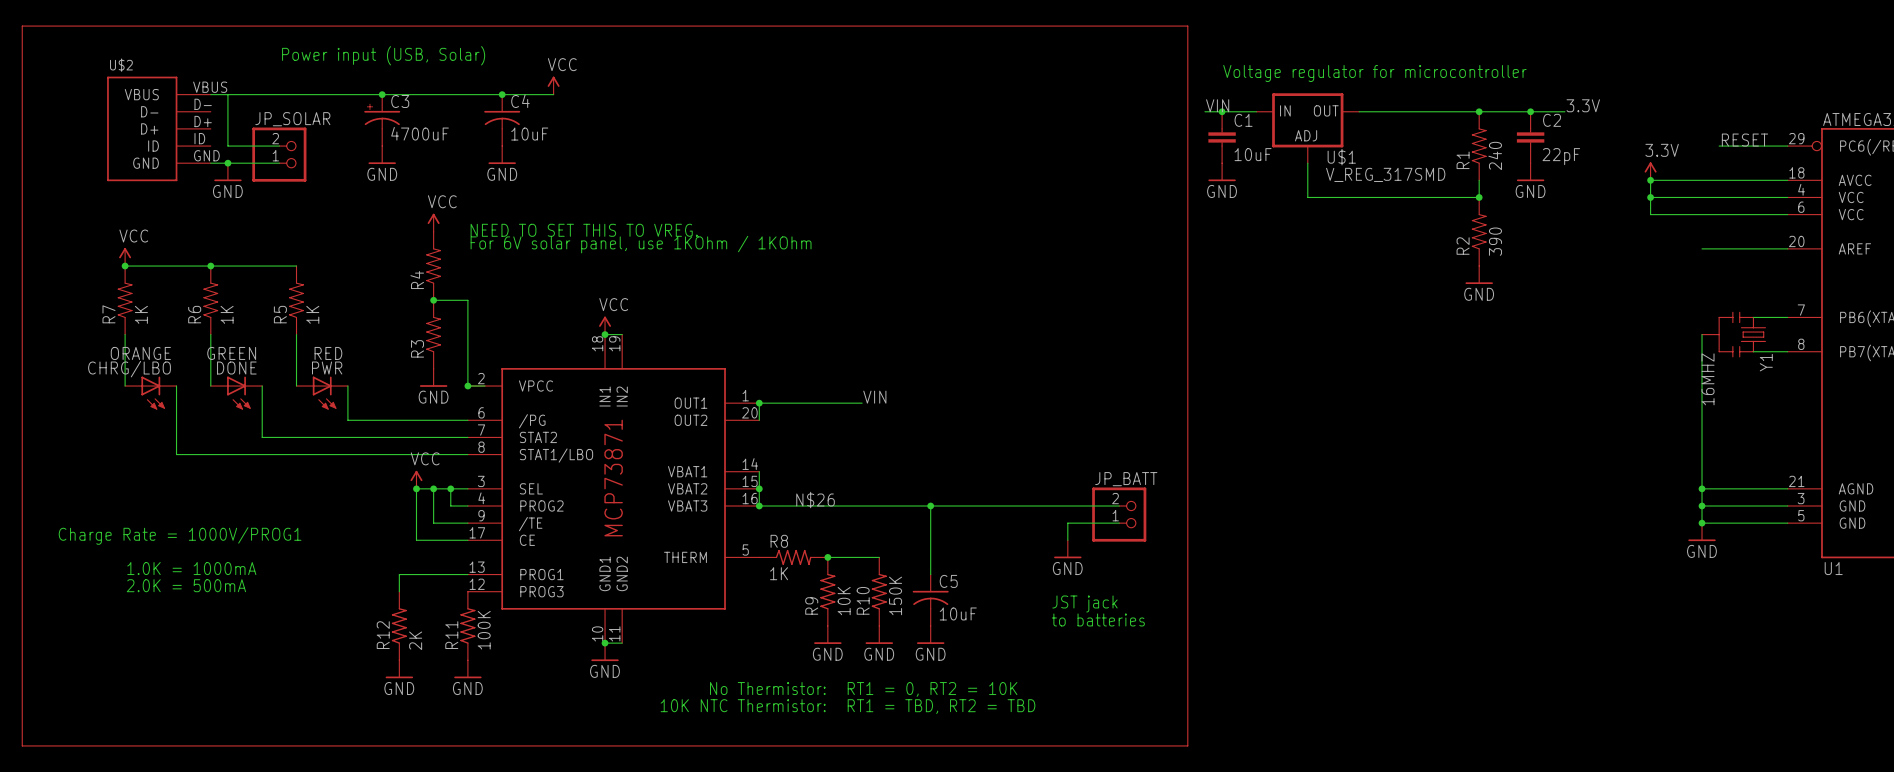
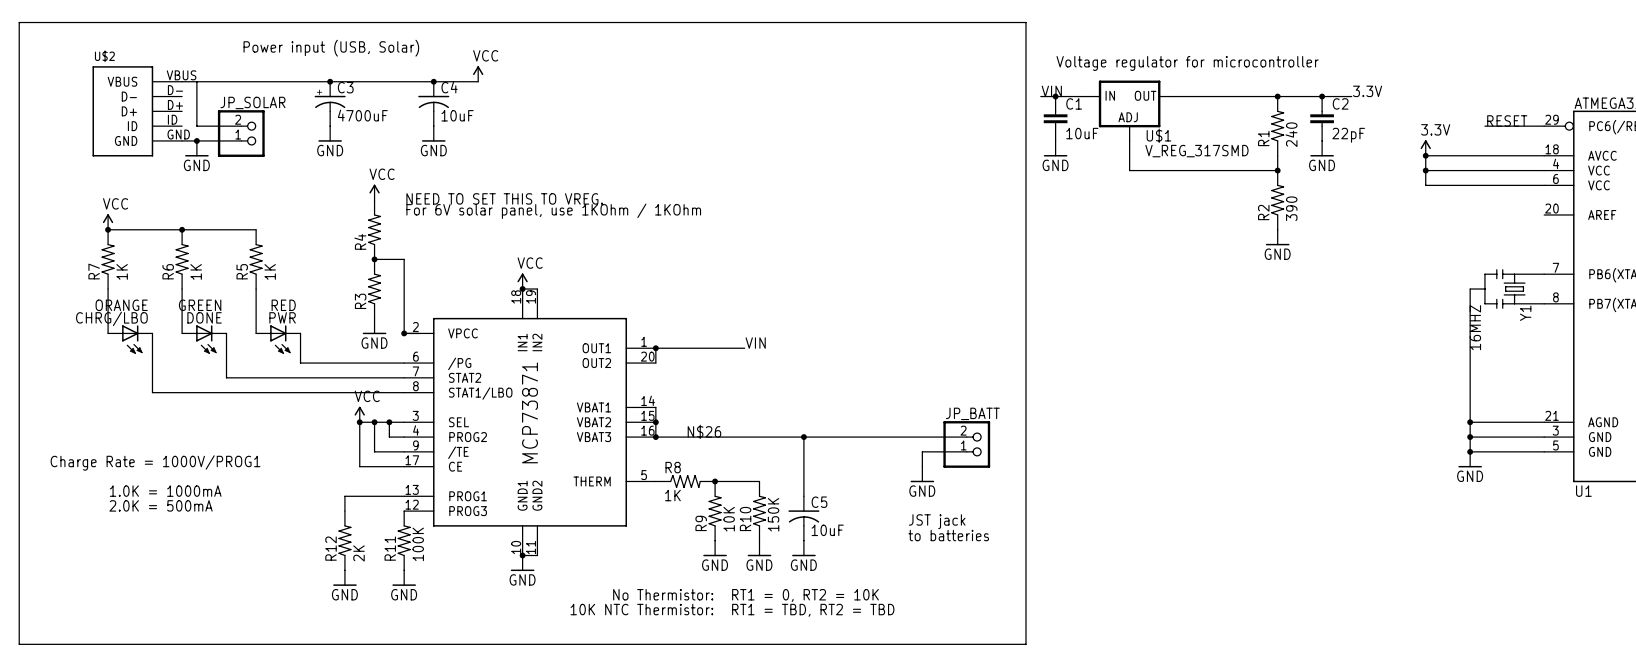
wire: (1702, 248) (1787, 248) -> none

